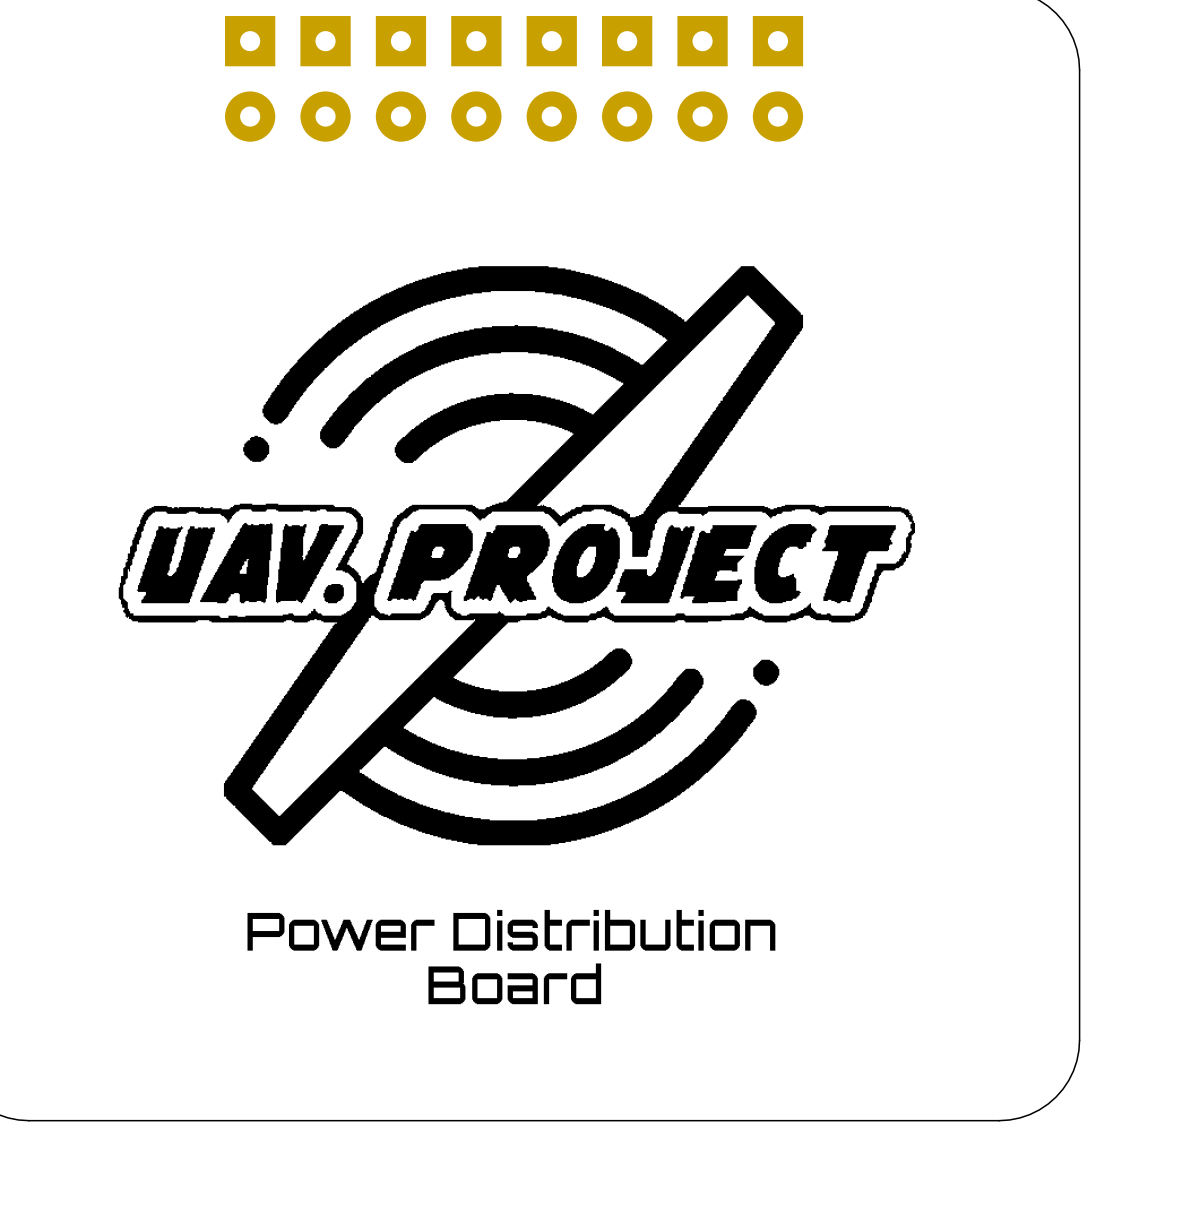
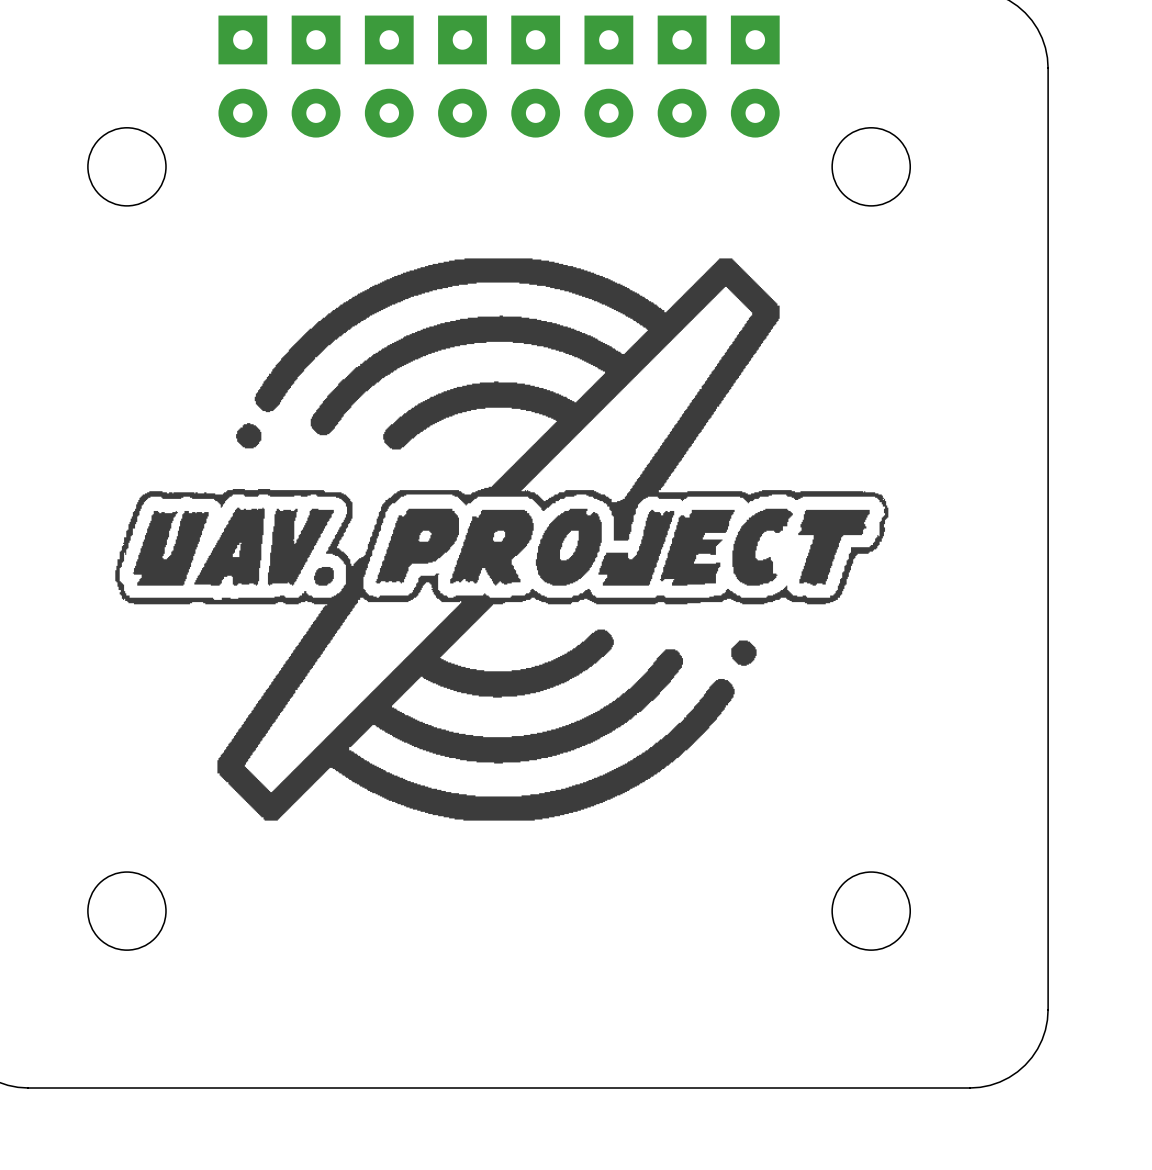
round board edge: none -> [87, 127, 166, 206]
round board edge: none -> [832, 127, 911, 206]
round board edge: none -> [87, 872, 166, 951]
round board edge: none -> [832, 872, 911, 951]
drawing: [247, 909, 776, 1005] -> none

